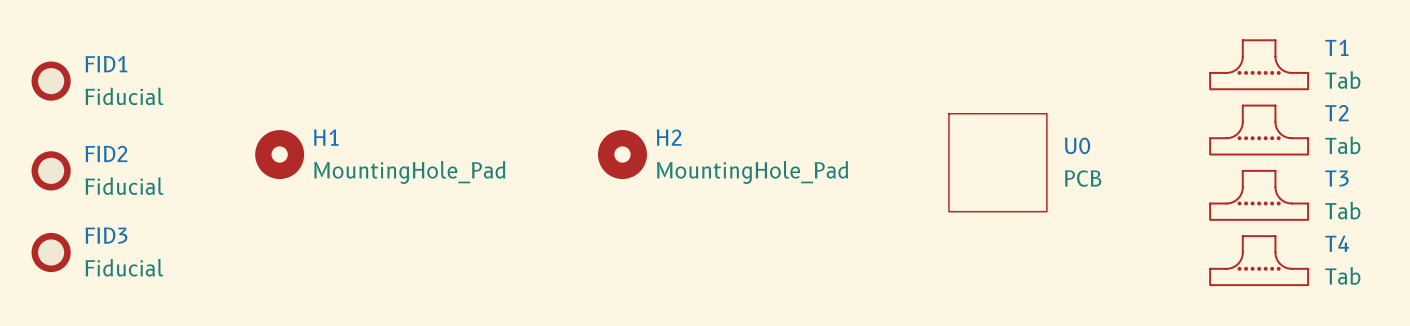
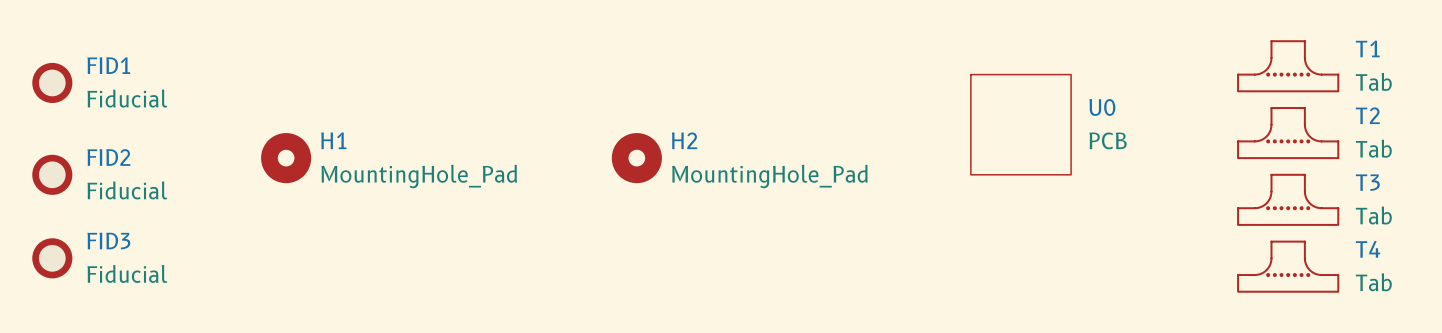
U0 position: (997, 162) -> (1020, 124)

